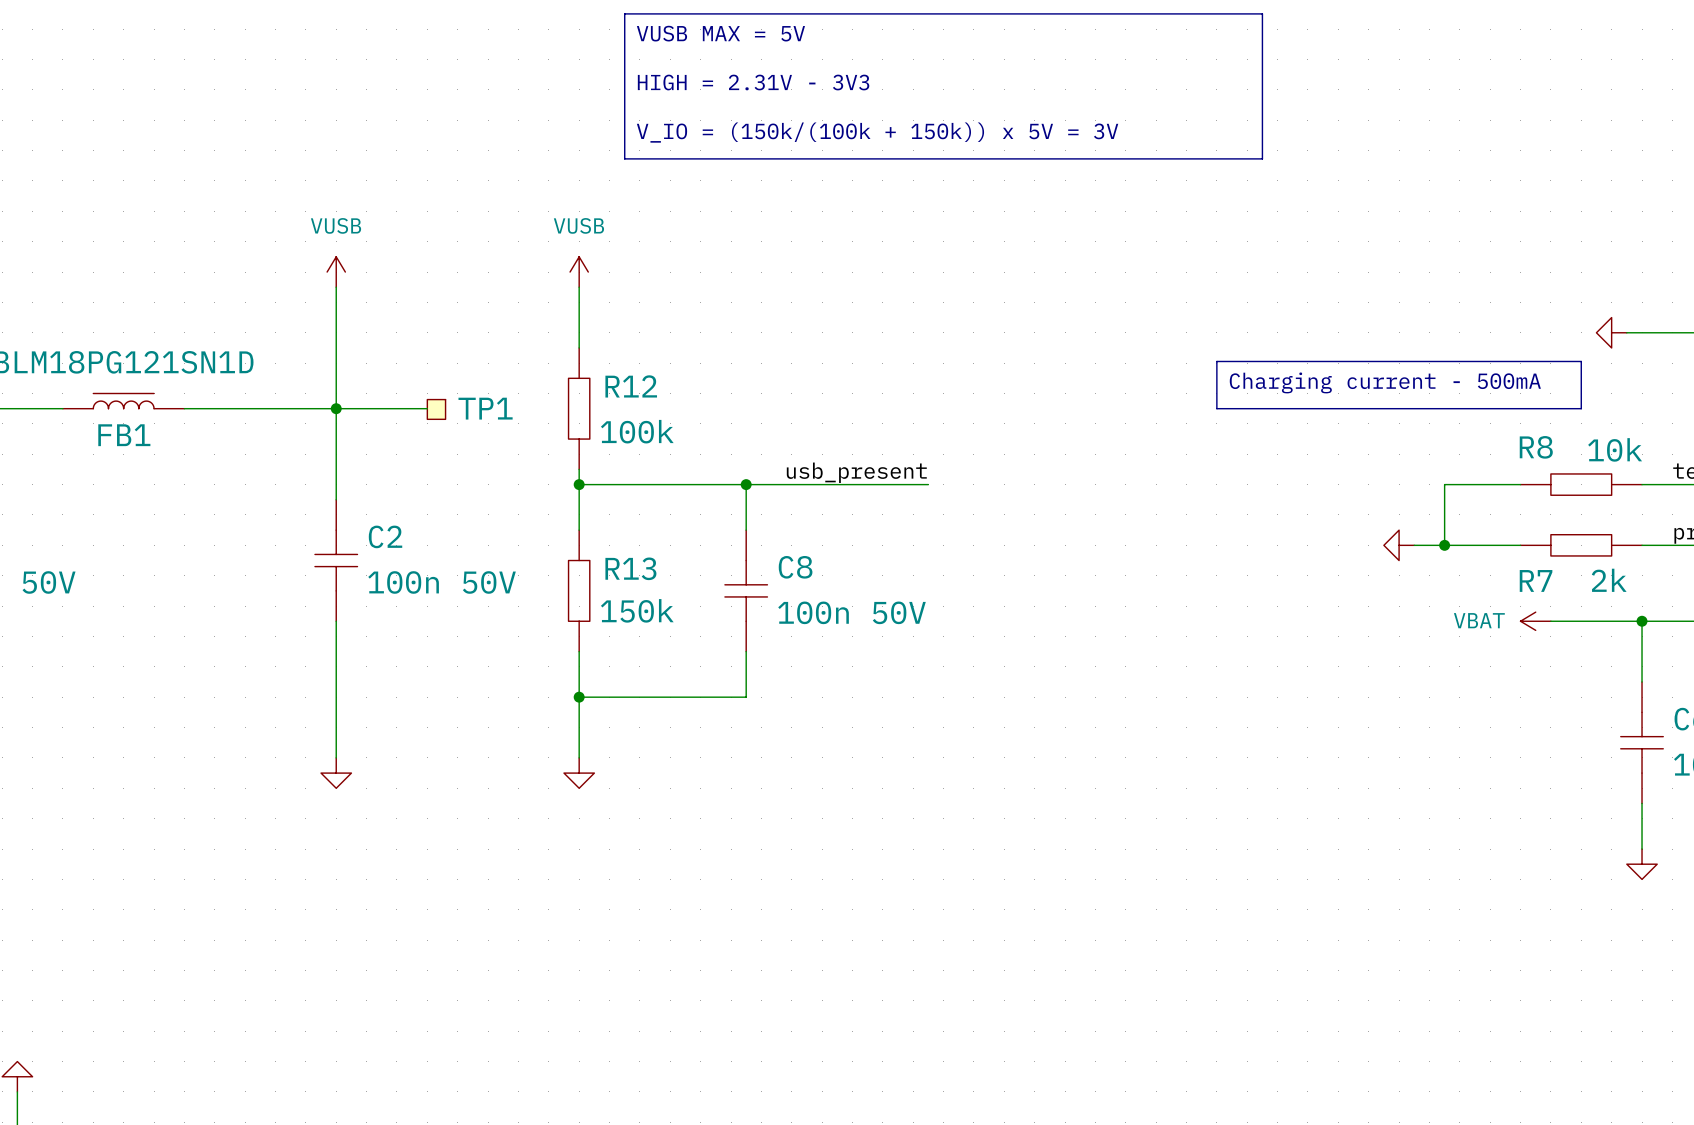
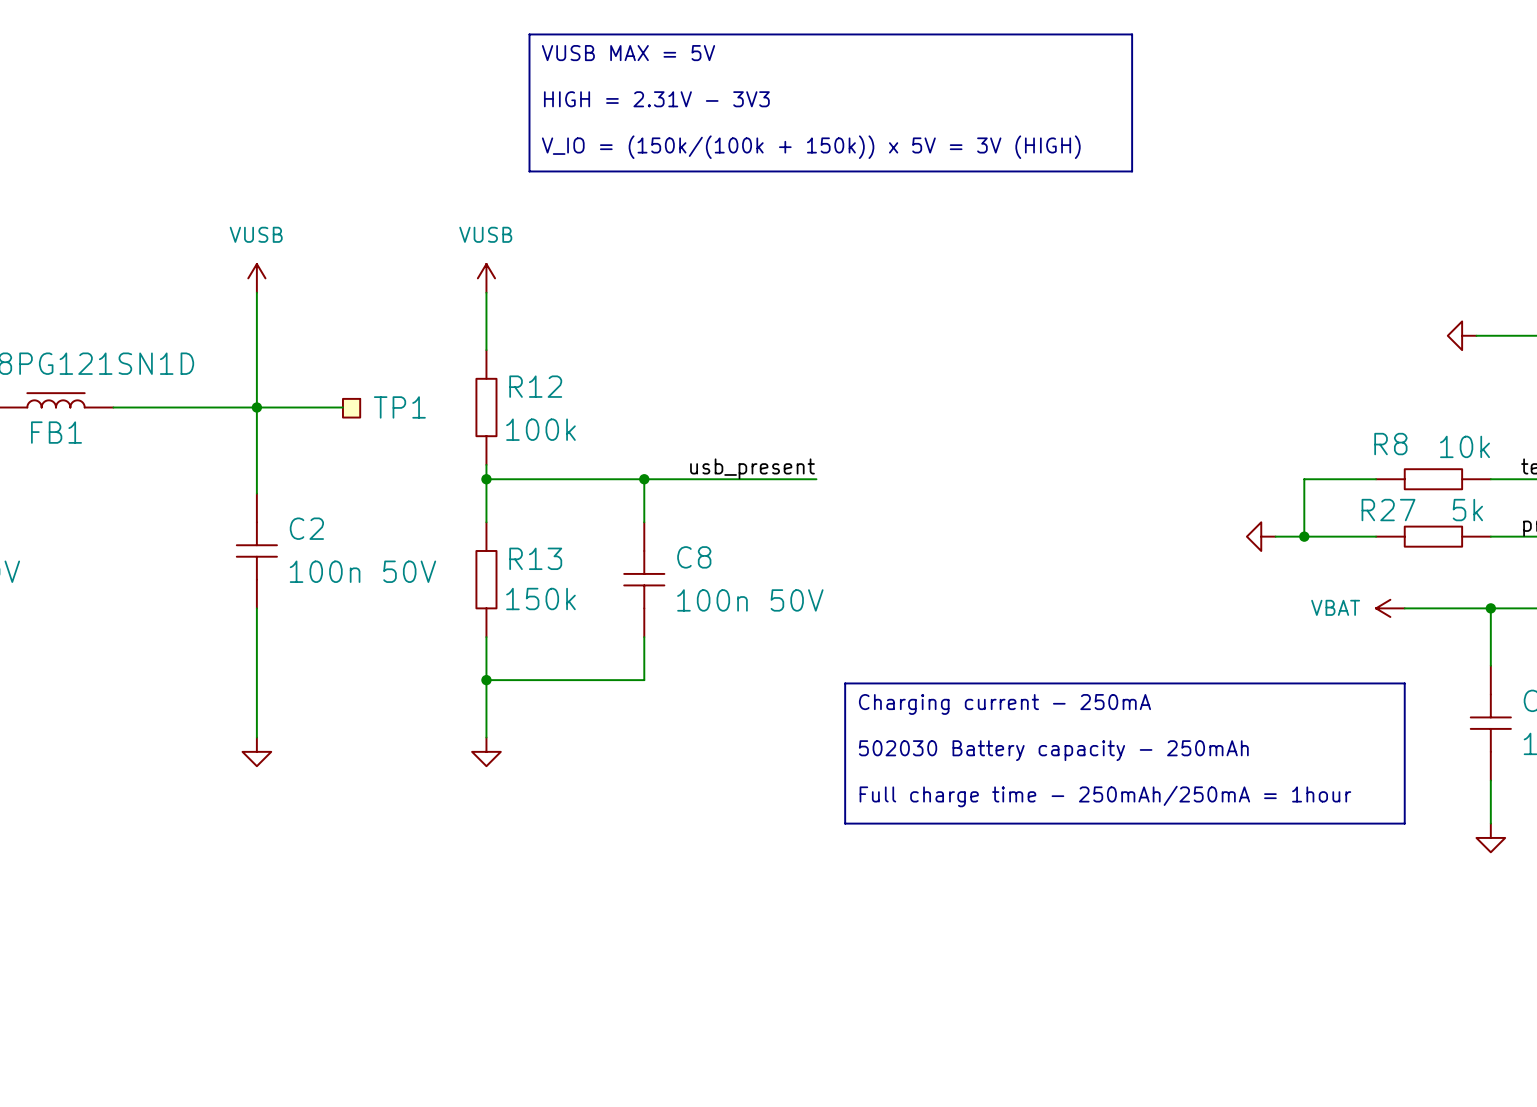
text: V_IO = (150k/(100k + 150k)) x 5V = 3V (877, 132) -> V_IO = (150k/(100k + 150k)) x 5V = 3V (HIGH) (811, 147)
line: (1216, 361) (1581, 361) (1581, 408) (1216, 408) (1216, 361) -> none
text: Charging current - 500mA (1385, 382) -> none
R7 name: R7 (1536, 580) -> R27 (1388, 510)
R7 value: 2k (1609, 580) -> 5k (1467, 510)
line: none -> (845, 683) (1404, 683) (1404, 823) (845, 823) (845, 683)
text: none -> Charging current - 250mA (1004, 704)
text: none -> 502030 Battery capacity - 250mAh (1053, 750)
text: none -> Full charge time - 250mAh/250mA = 1hour (1105, 796)

